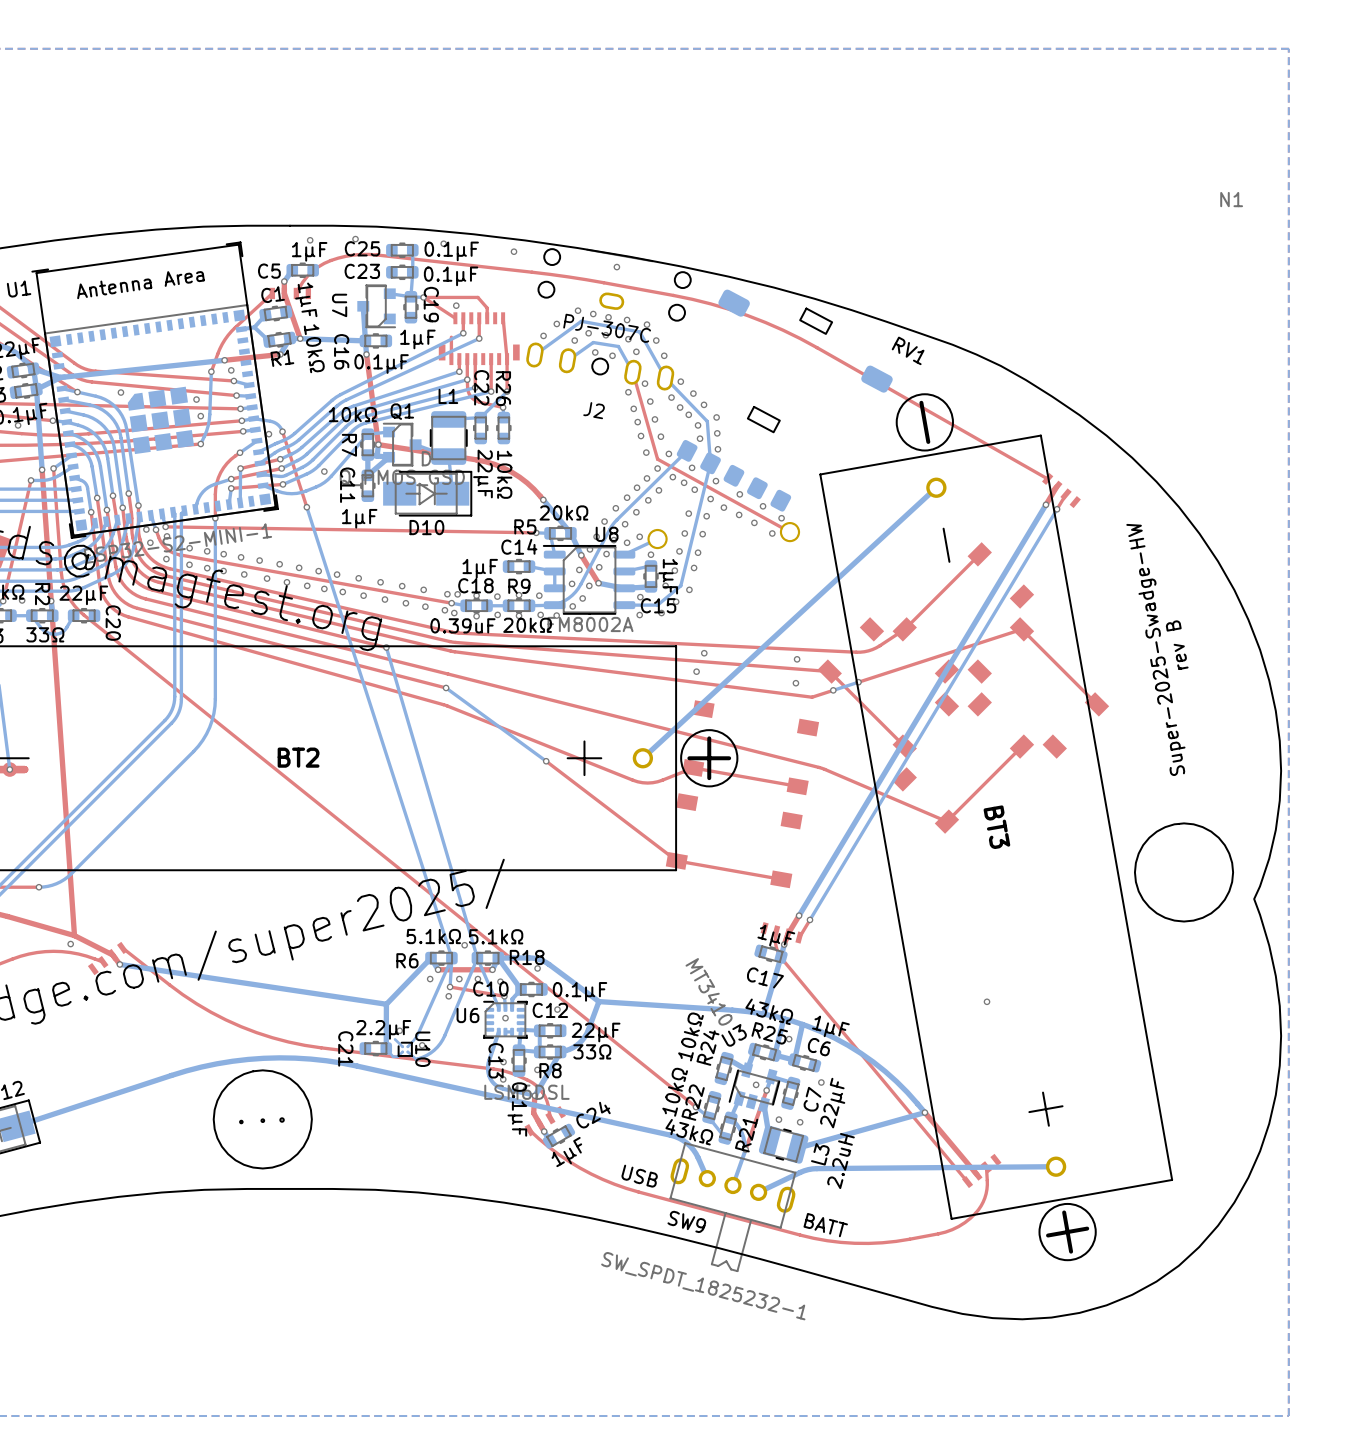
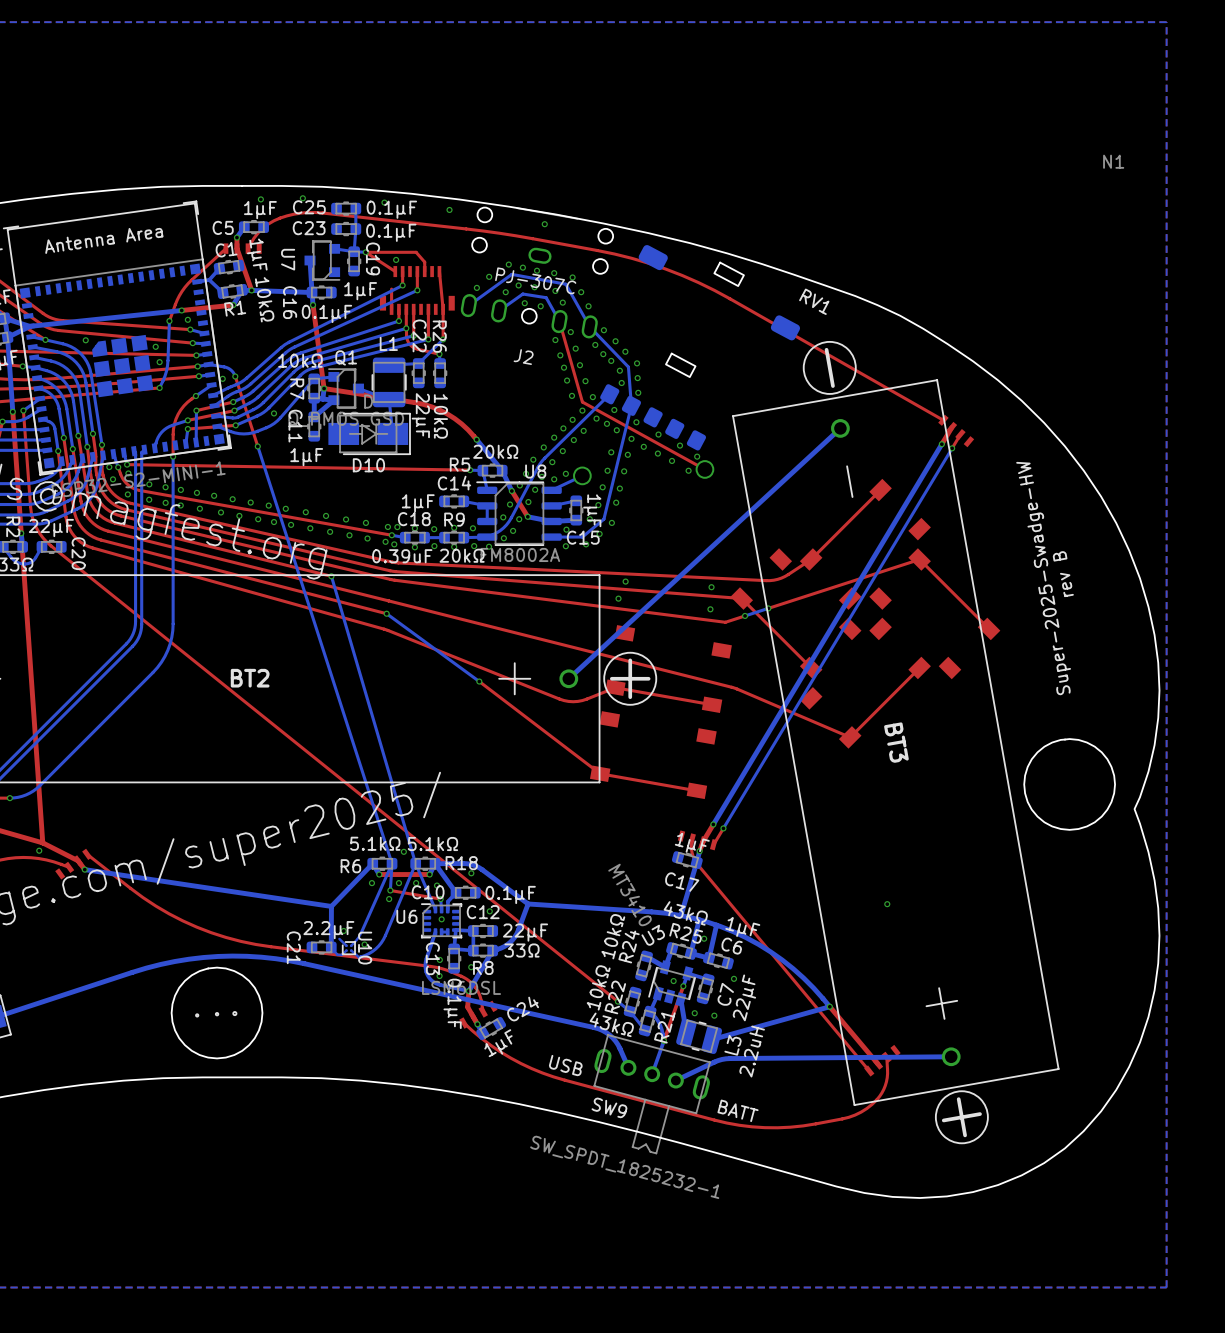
via: (650, 554) -> none

